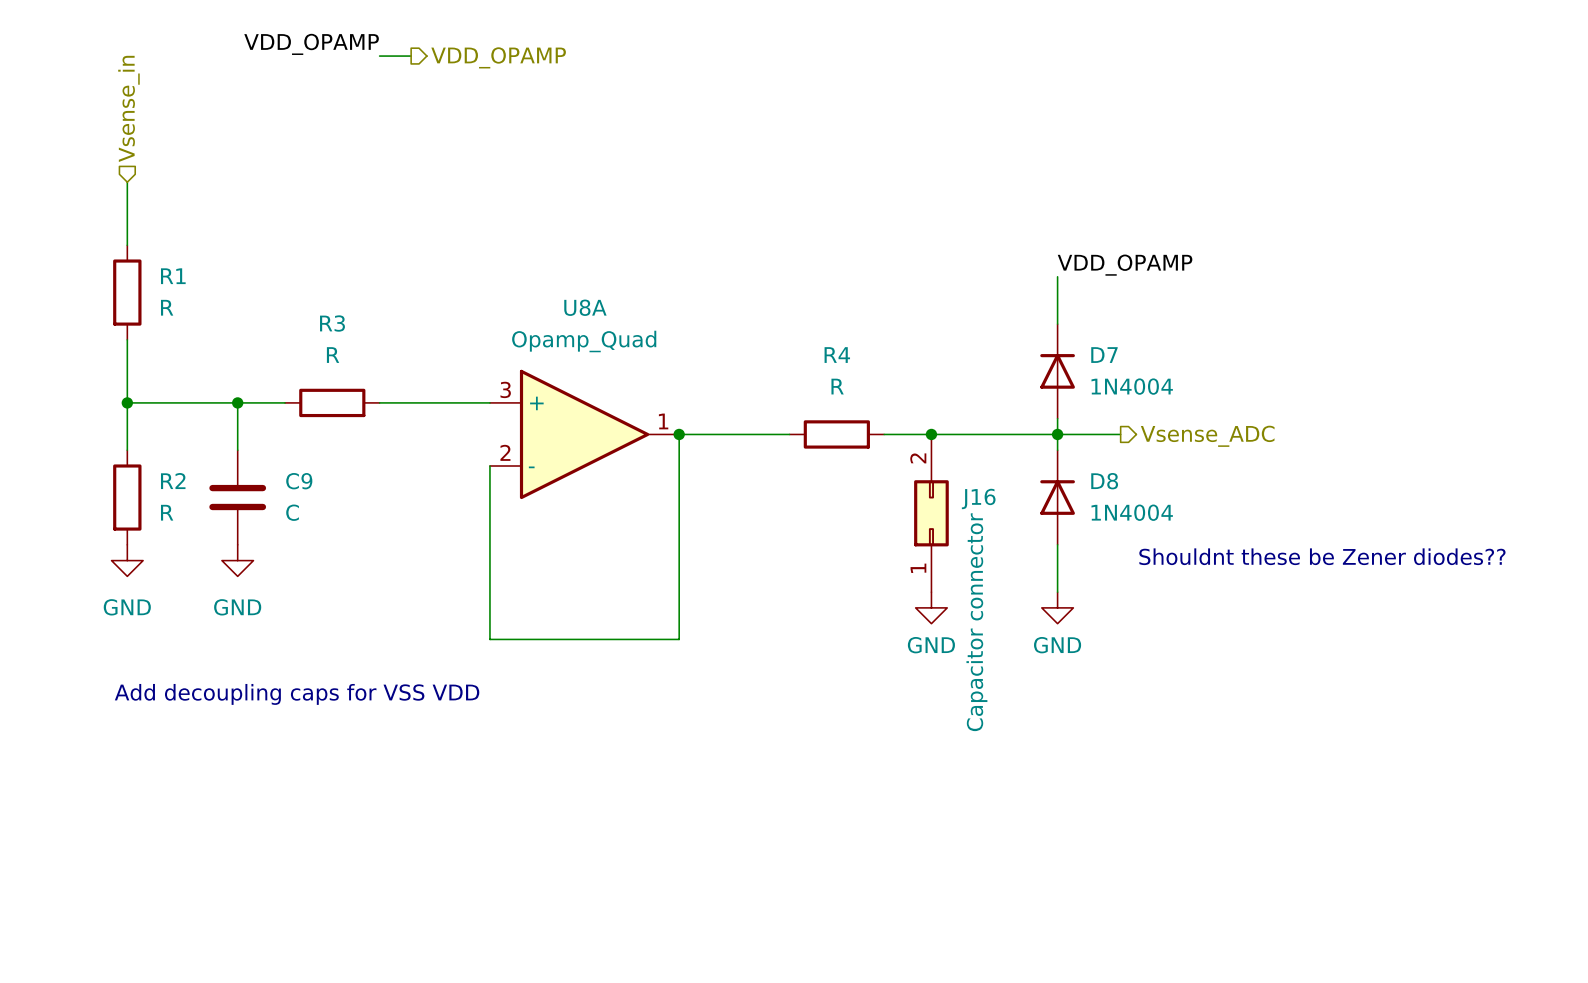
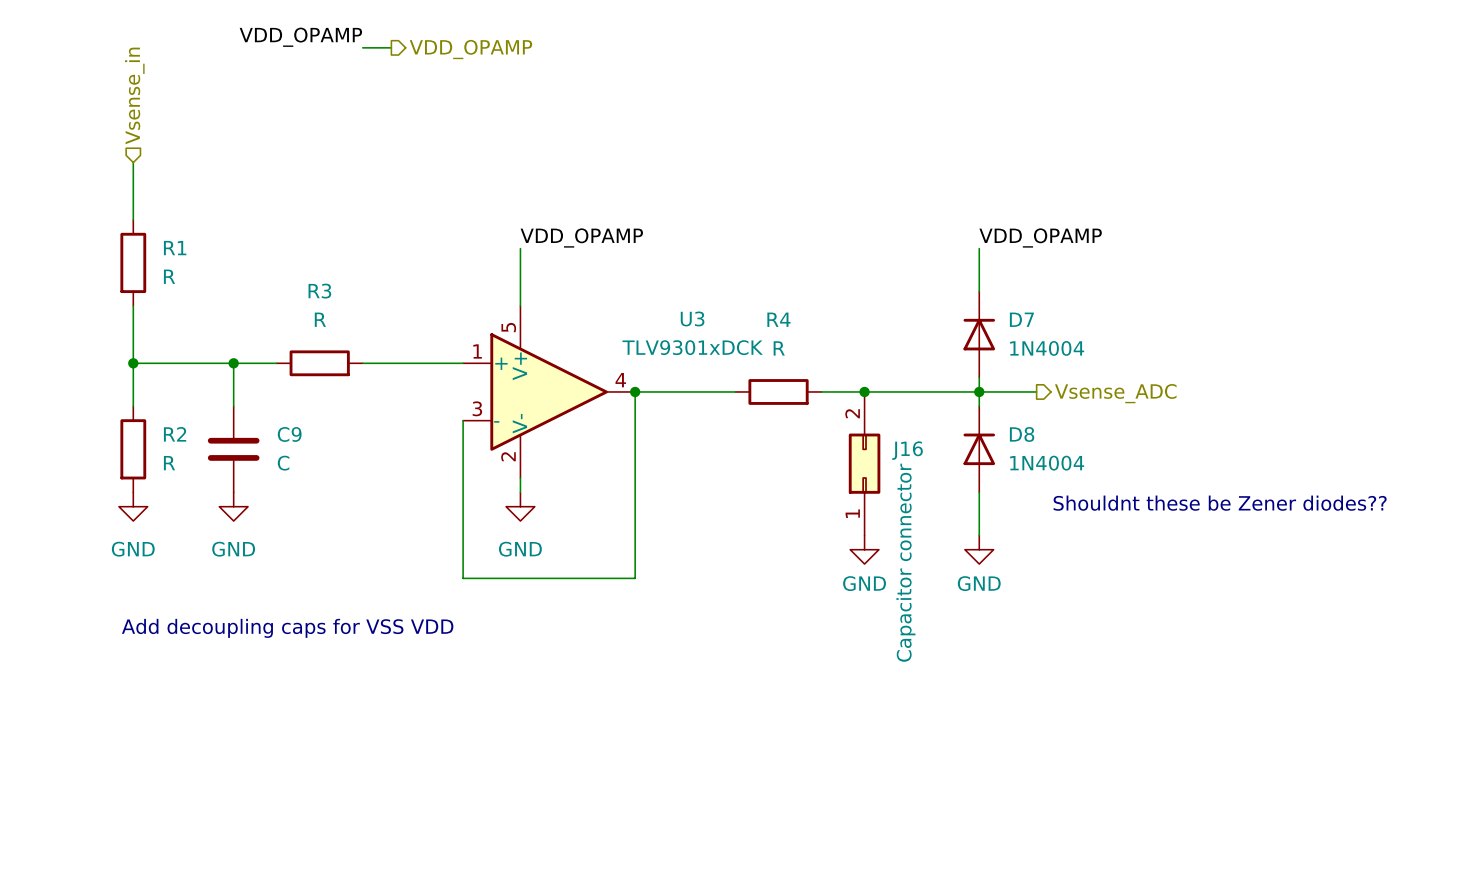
label: none -> VDD_OPAMP (581, 237)
wire: none -> (520, 248) (520, 305)
U8A: Opamp_Quad (584, 434) -> none
U3: none -> TLV9301xDCK (549, 391)
wire: none -> (520, 478) (520, 492)
power symbol: none -> GND (520, 506)

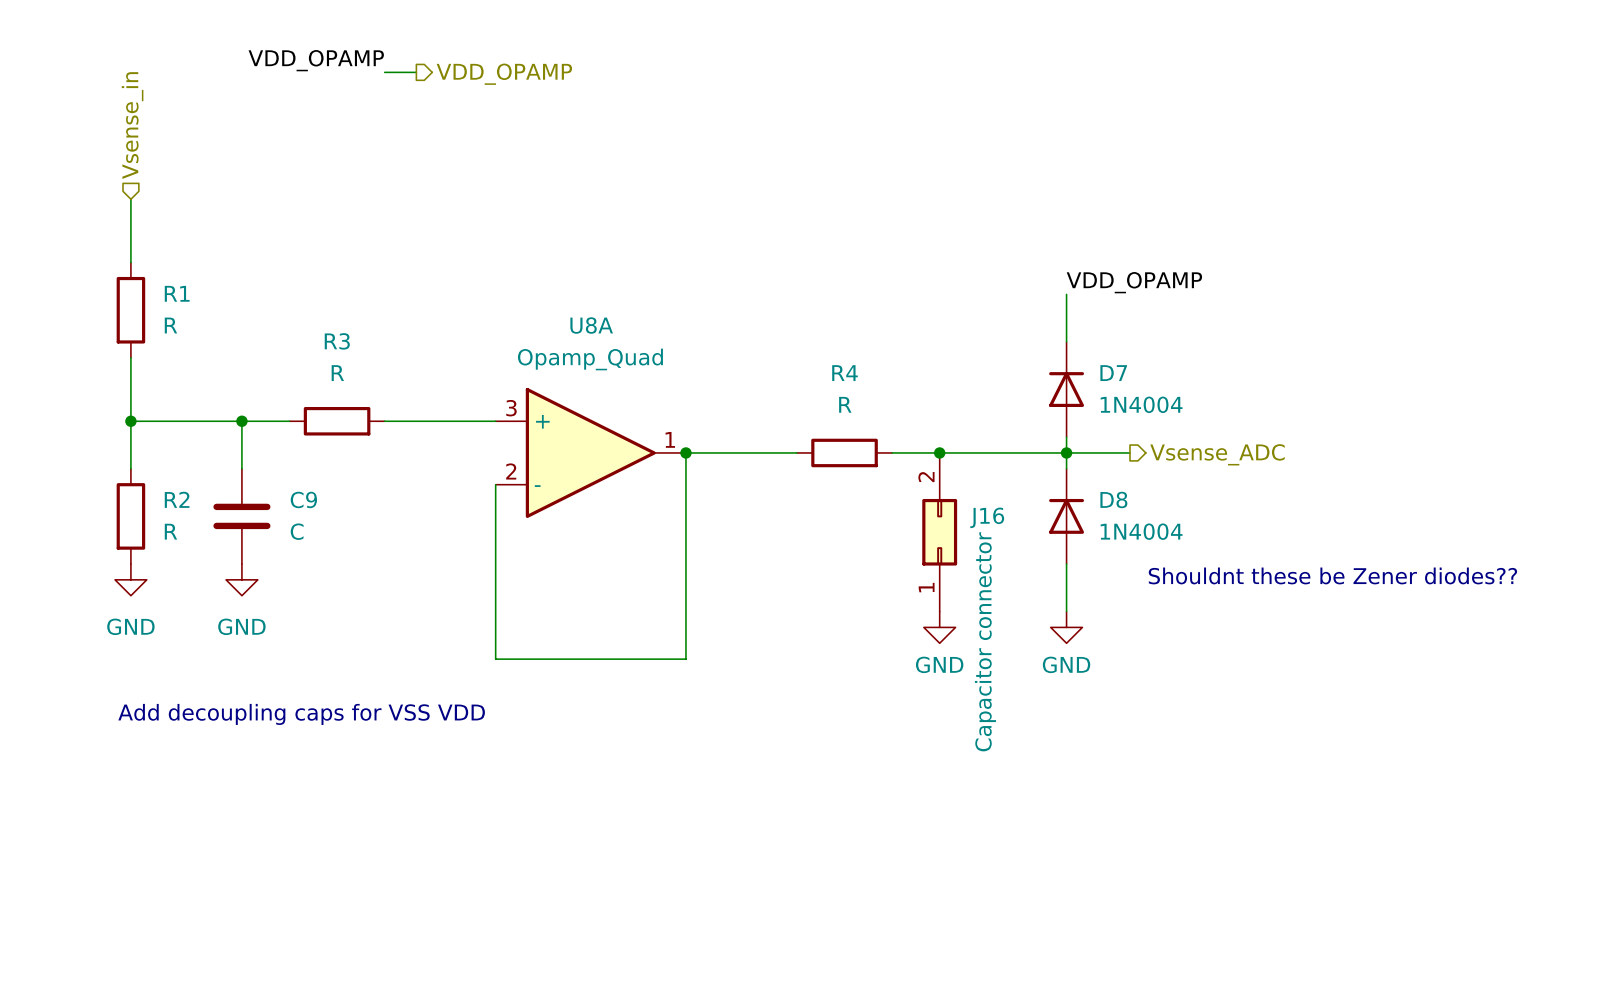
label: VDD_OPAMP (581, 237) -> none
wire: (520, 248) (520, 305) -> none
U3: TLV9301xDCK (549, 391) -> none
U8A: none -> Opamp_Quad (590, 452)
wire: (520, 478) (520, 492) -> none
power symbol: GND (520, 506) -> none

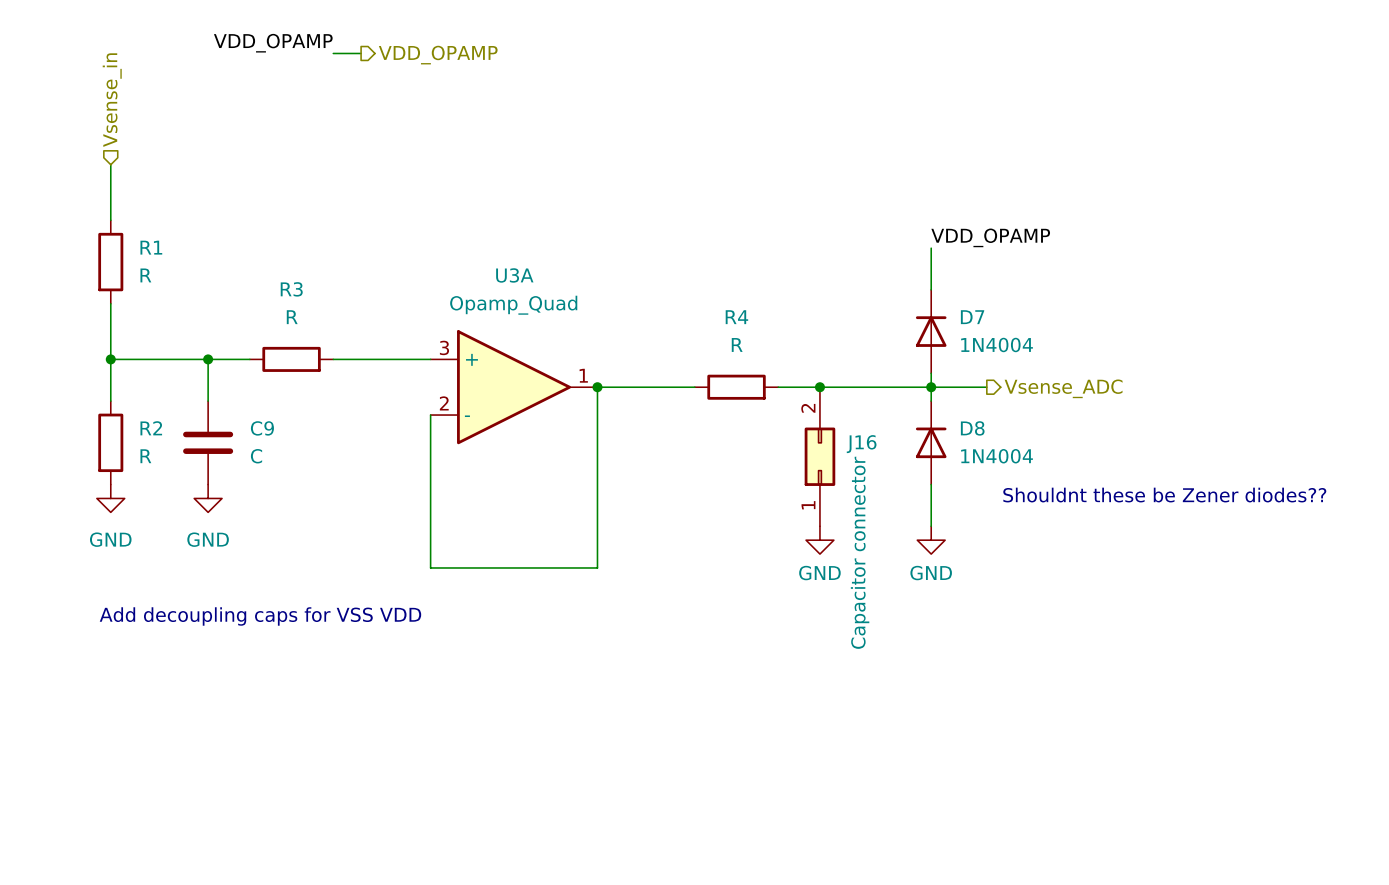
U8A name: U8A (591, 325) -> U3A (514, 275)

